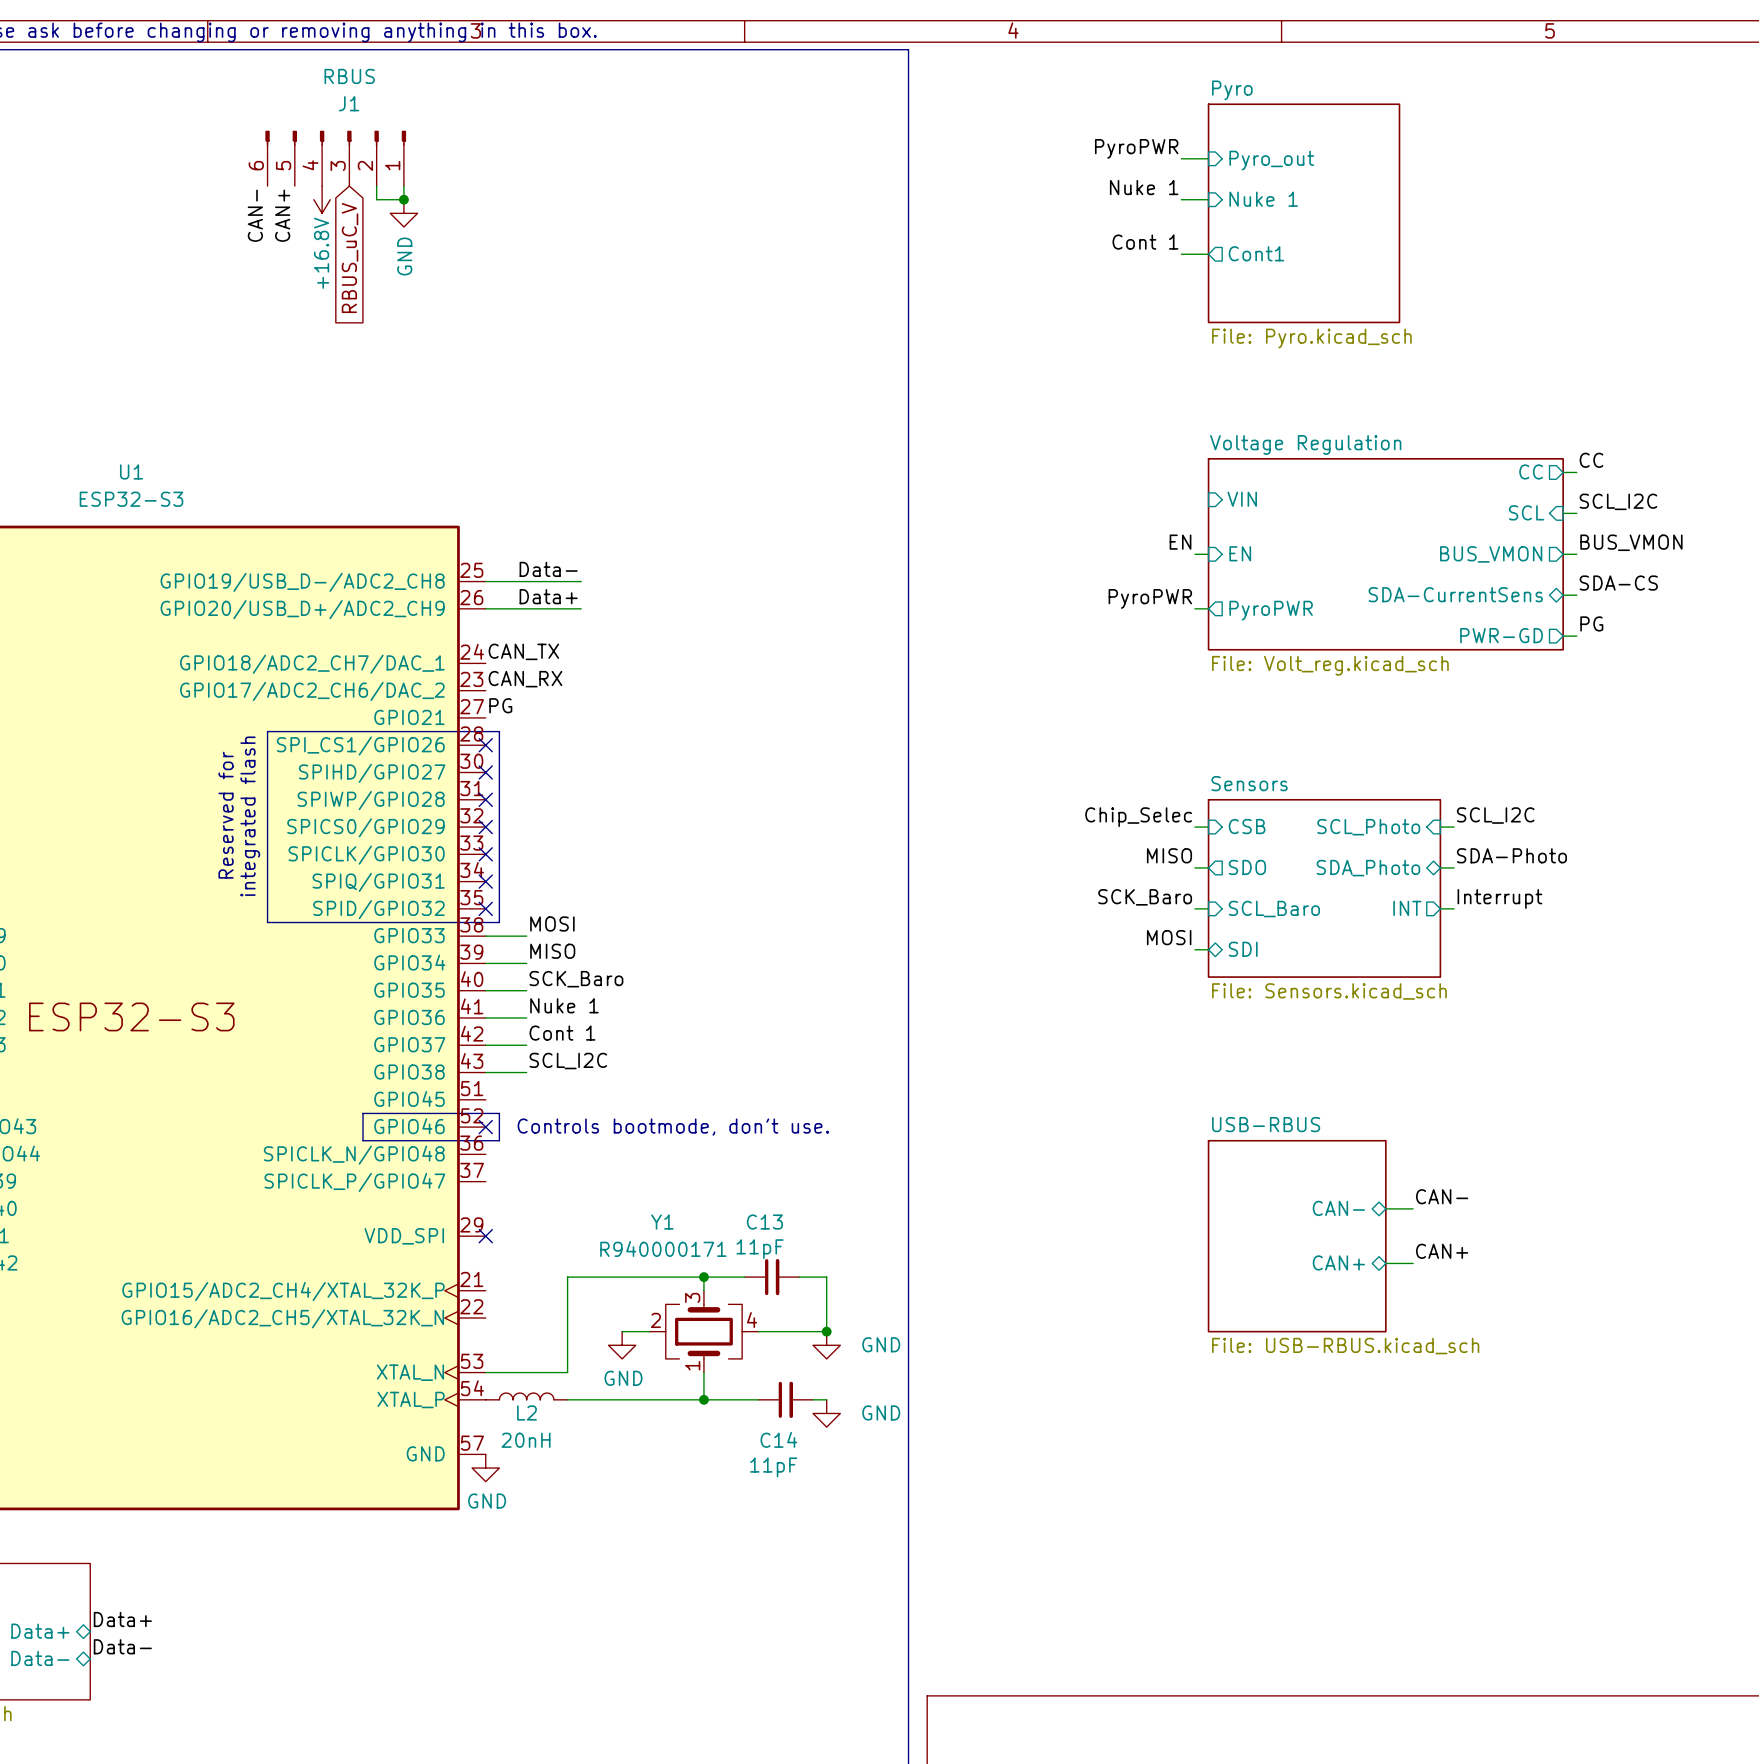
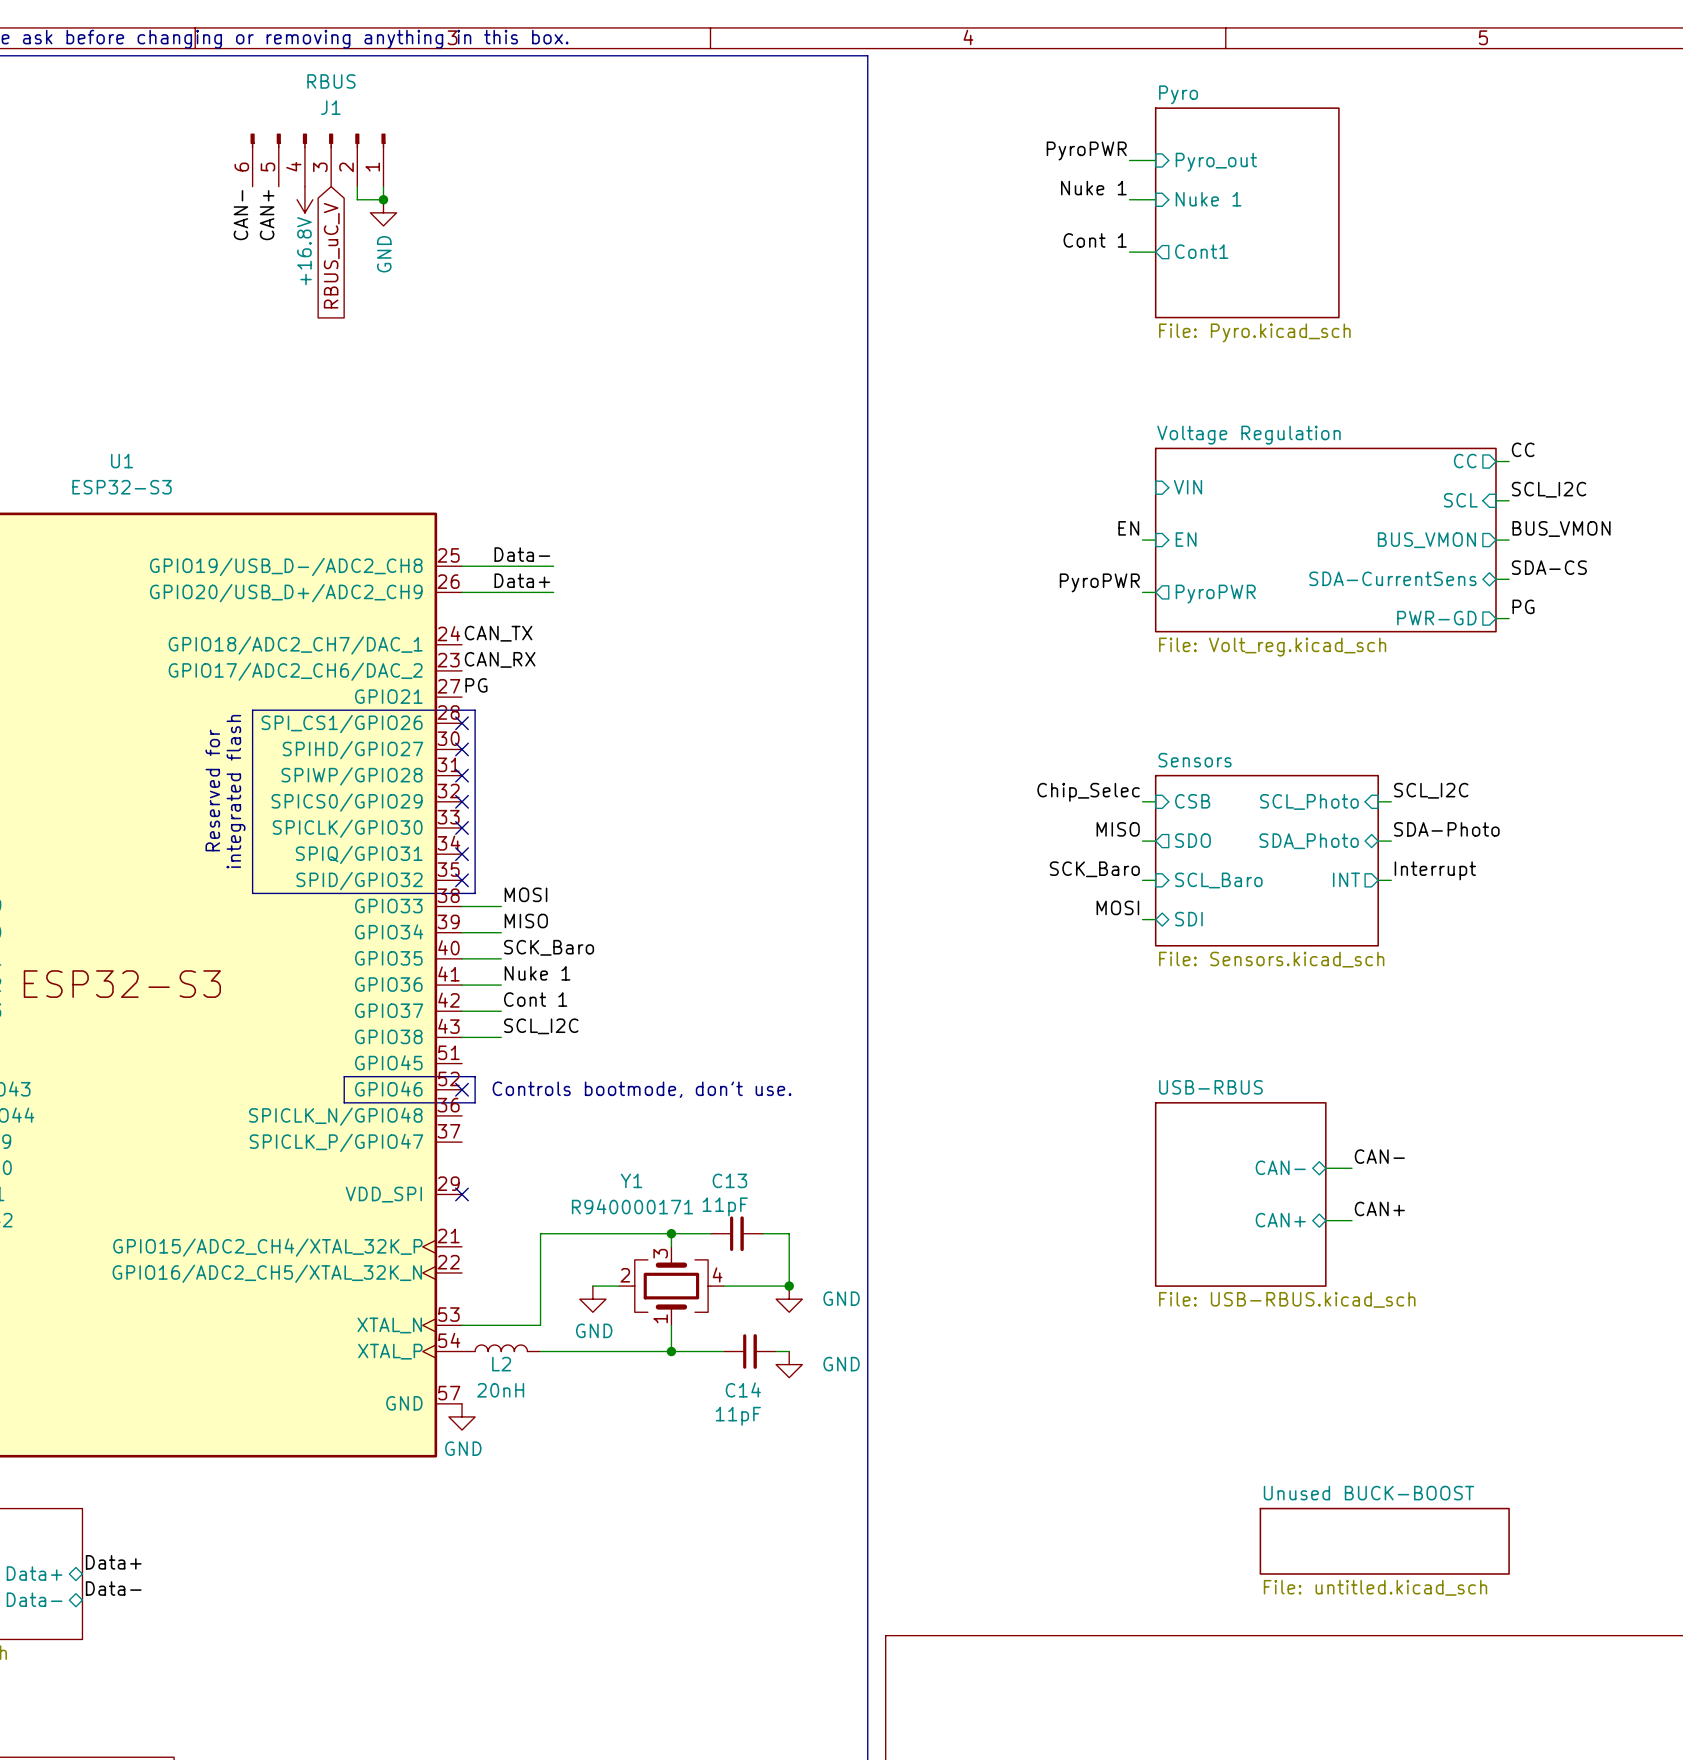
sheet Unused BUCK-BOOST: none -> File: untitled.kicad_sch (1384, 1541)

